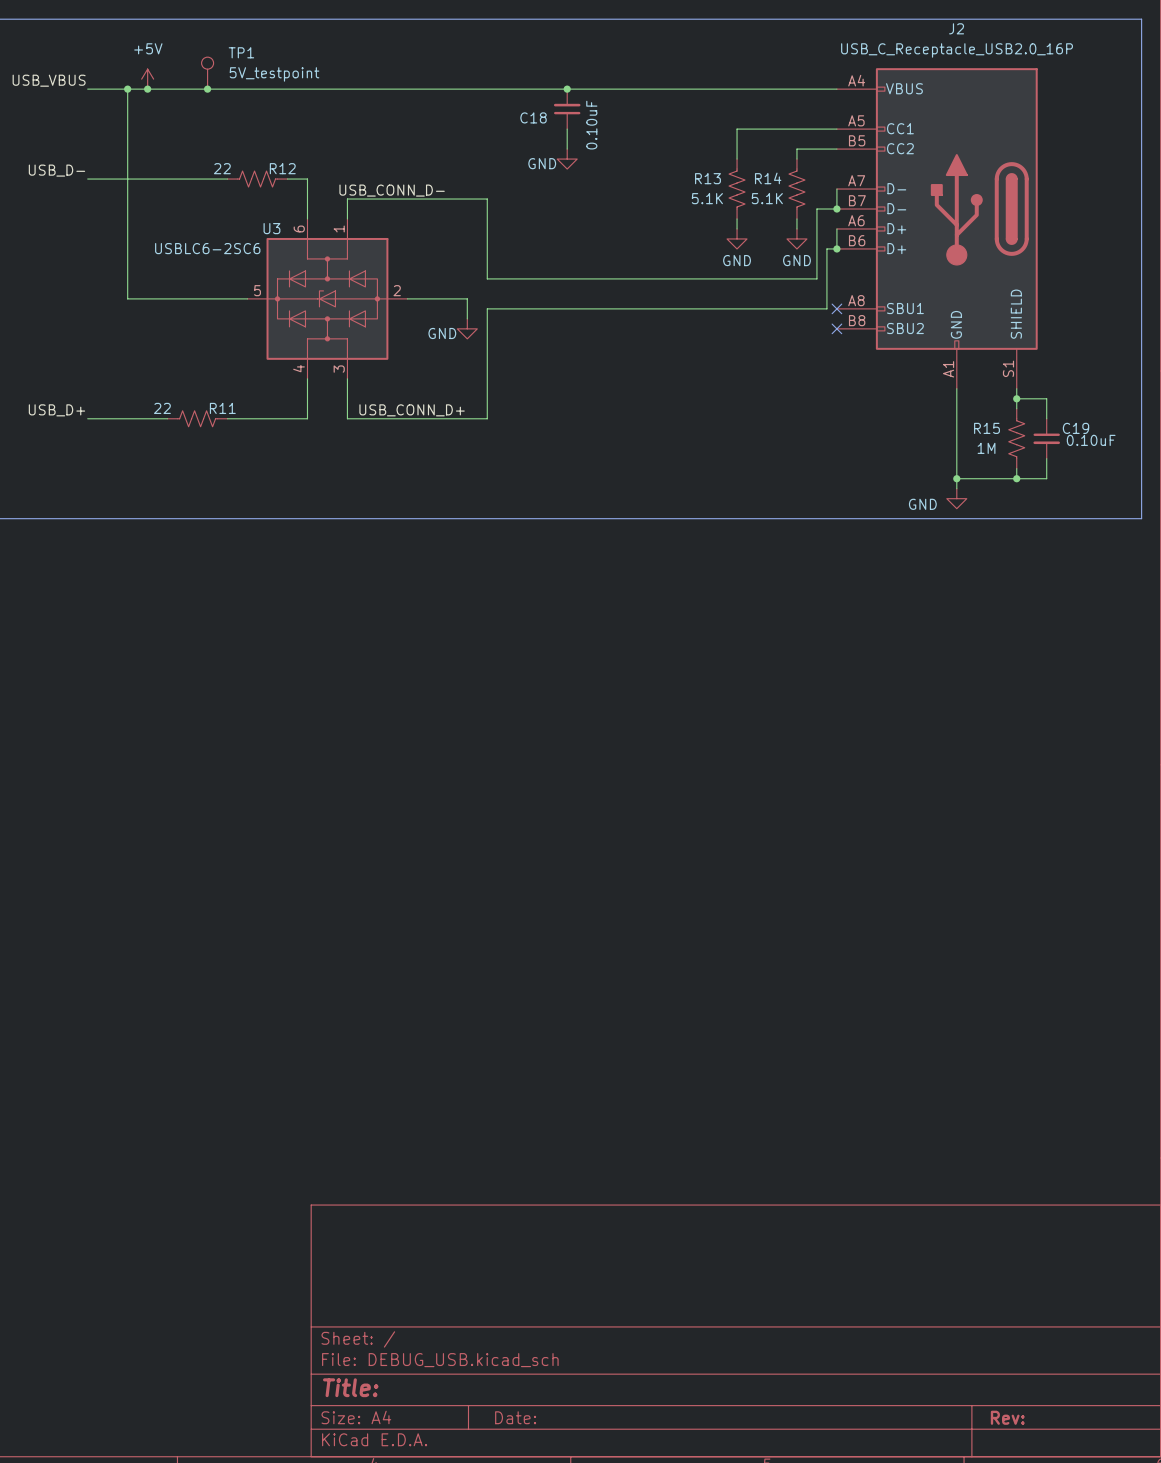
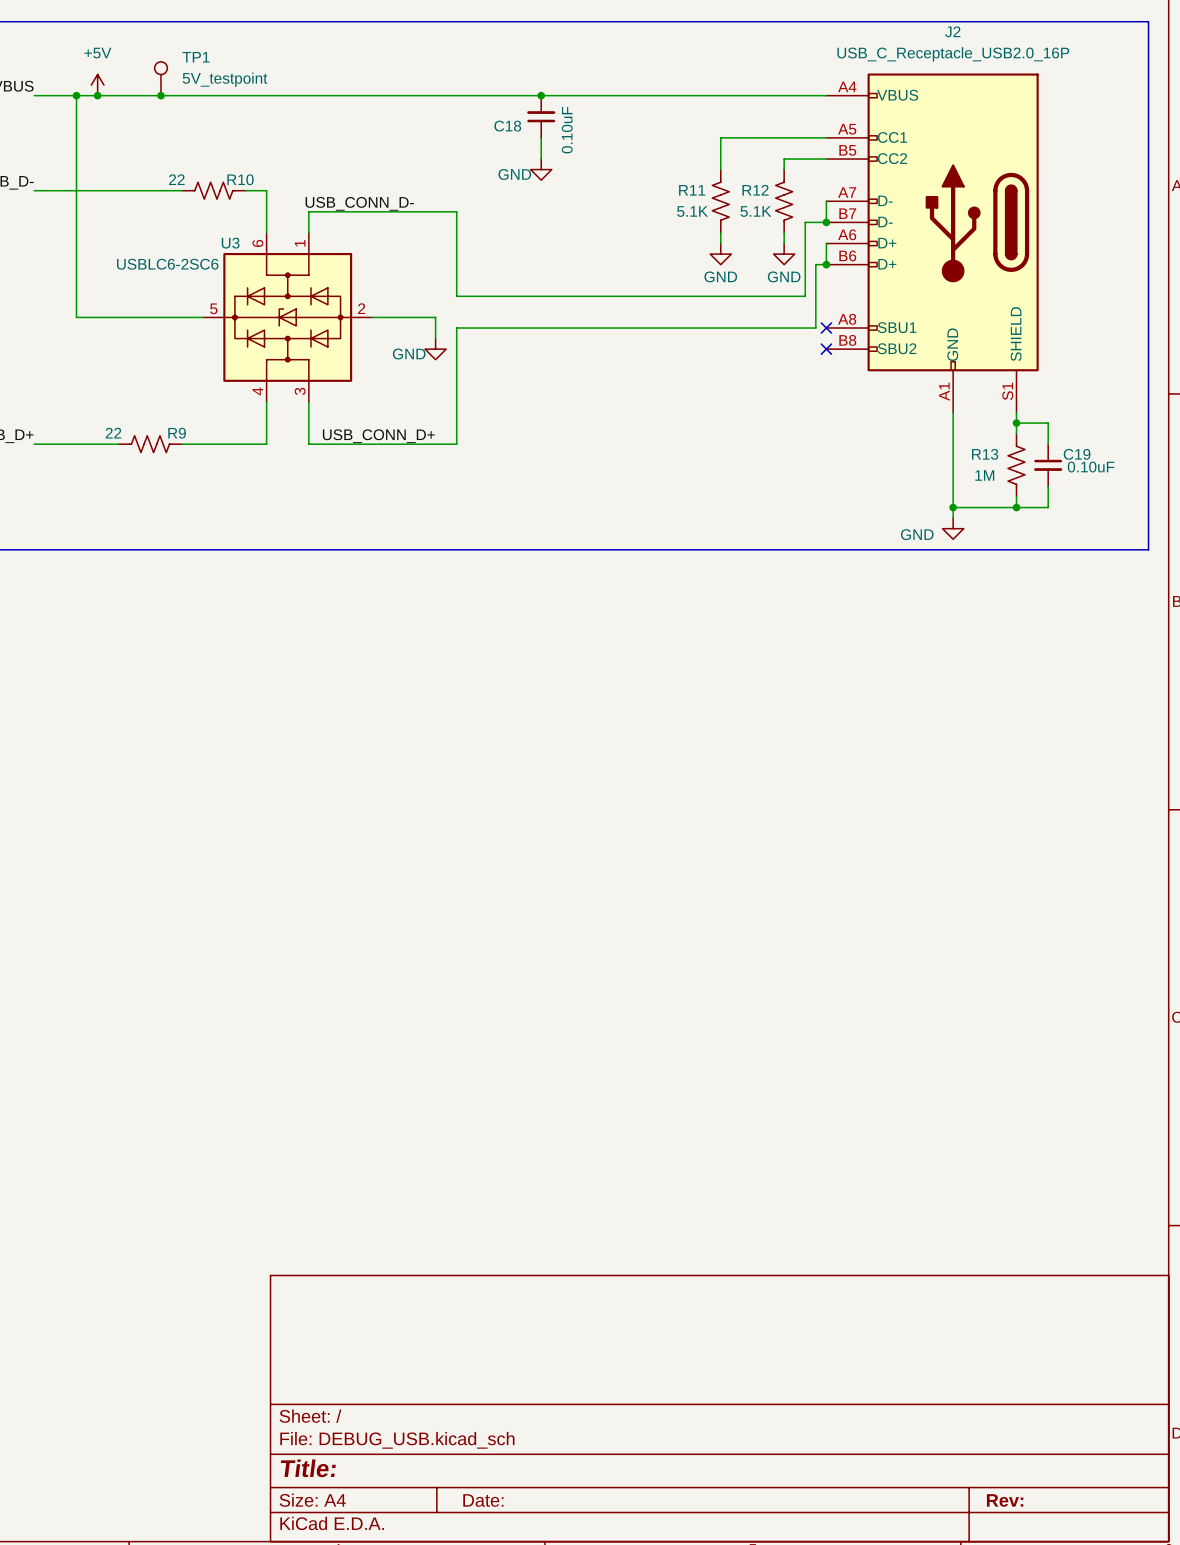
R12 name: R12 (282, 168) -> R10 (240, 179)
R13 name: R13 (707, 178) -> R11 (692, 190)
R14 name: R14 (768, 178) -> R12 (755, 190)
R11 name: R11 (222, 408) -> R9 (177, 433)
R15 name: R15 (987, 428) -> R13 (985, 454)

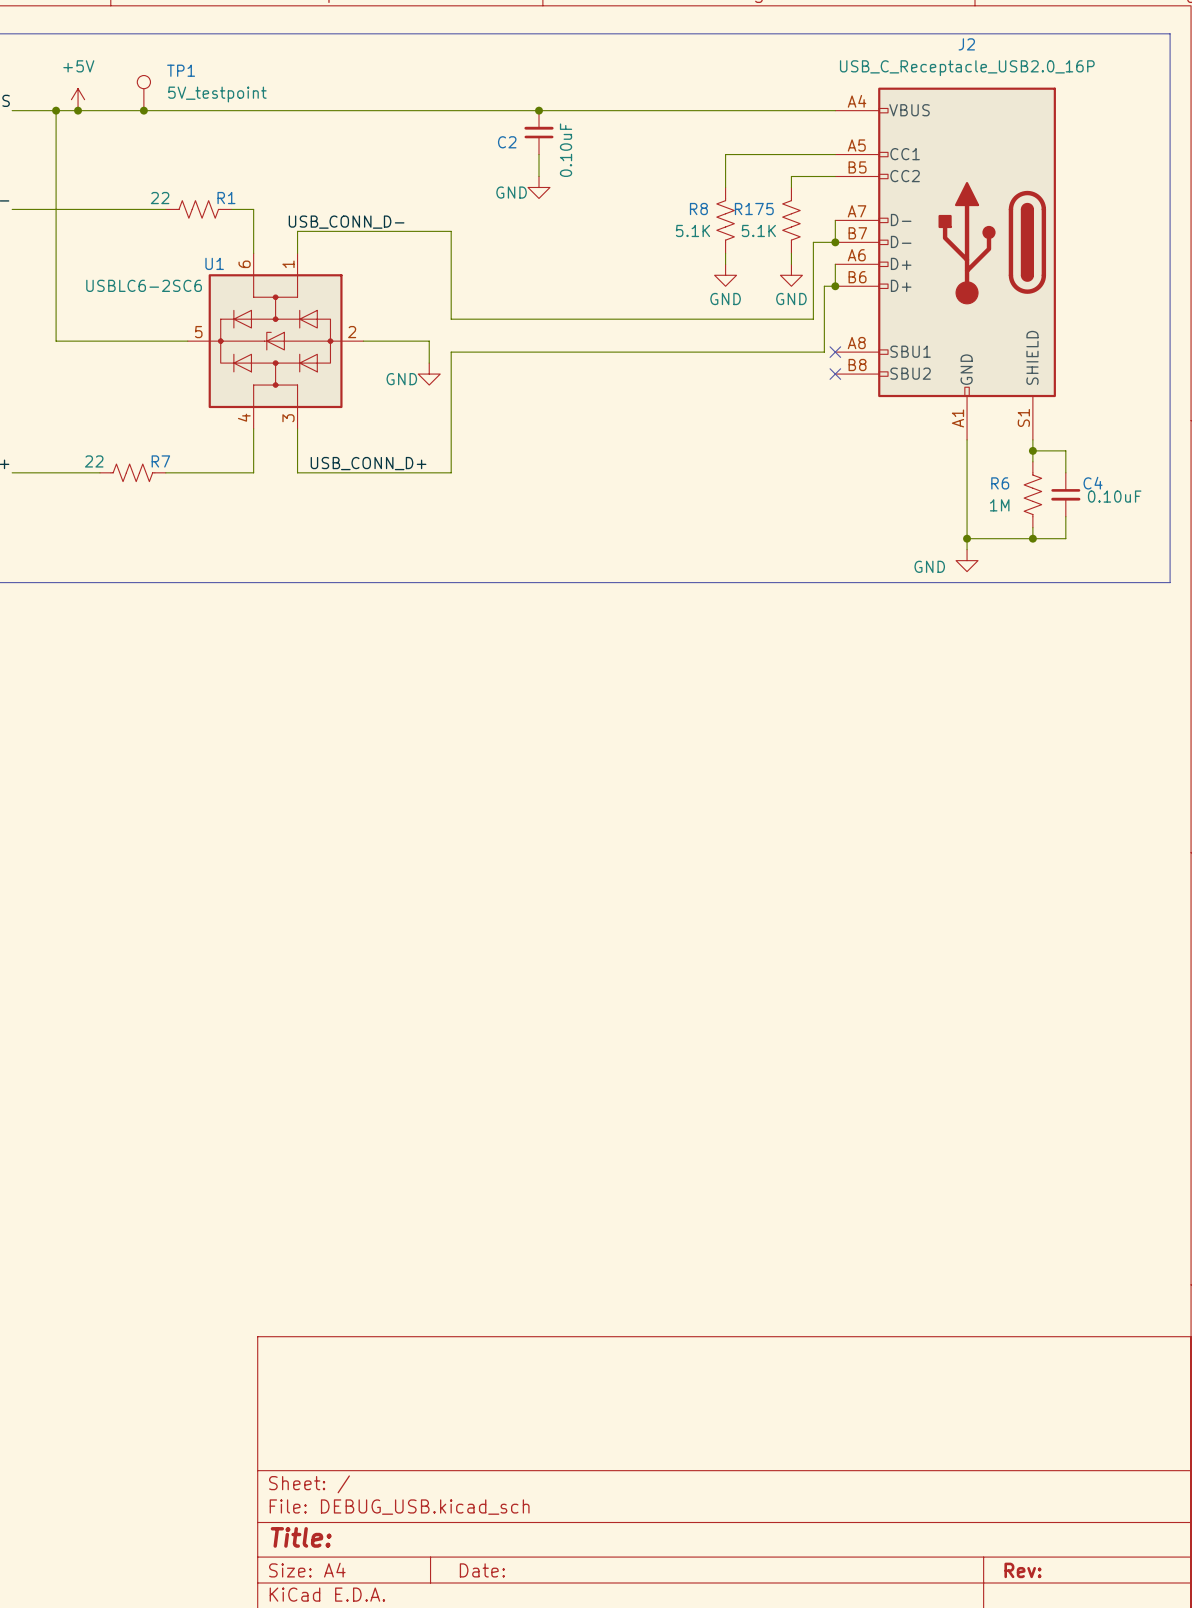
C18 name: C18 (507, 126) -> C2 (507, 142)
R10 name: R10 (240, 179) -> R1 (226, 198)
R11 name: R11 (692, 190) -> R8 (698, 209)
R12 name: R12 (755, 190) -> R175 (754, 209)
U3 name: U3 (230, 243) -> U1 (214, 263)
R9 name: R9 (177, 433) -> R7 (160, 461)
R13 name: R13 (985, 454) -> R6 (1000, 483)
C19 name: C19 (1077, 454) -> C4 (1093, 483)

